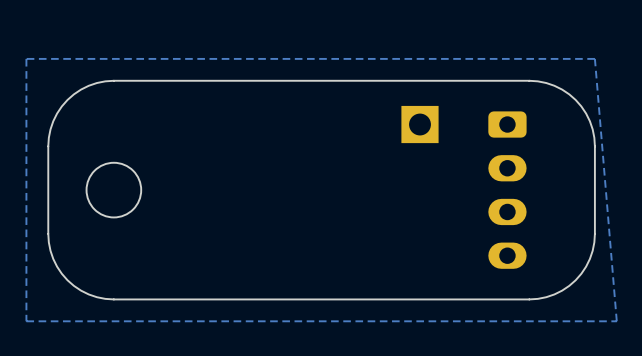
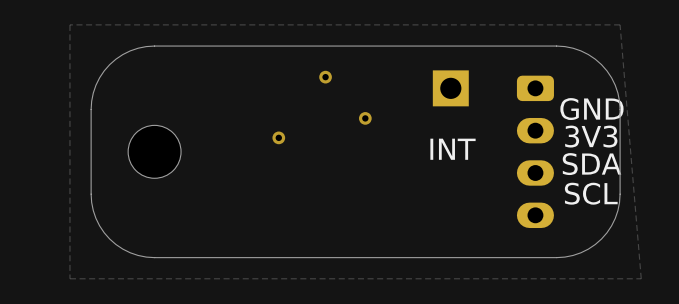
via: none -> (325, 77)
text: none -> GND (591, 109)
via: none -> (365, 118)
text: none -> 3V3 (591, 136)
via: none -> (278, 137)
text: none -> INT (453, 149)
text: none -> SDA (591, 164)
text: none -> SCL (591, 193)

